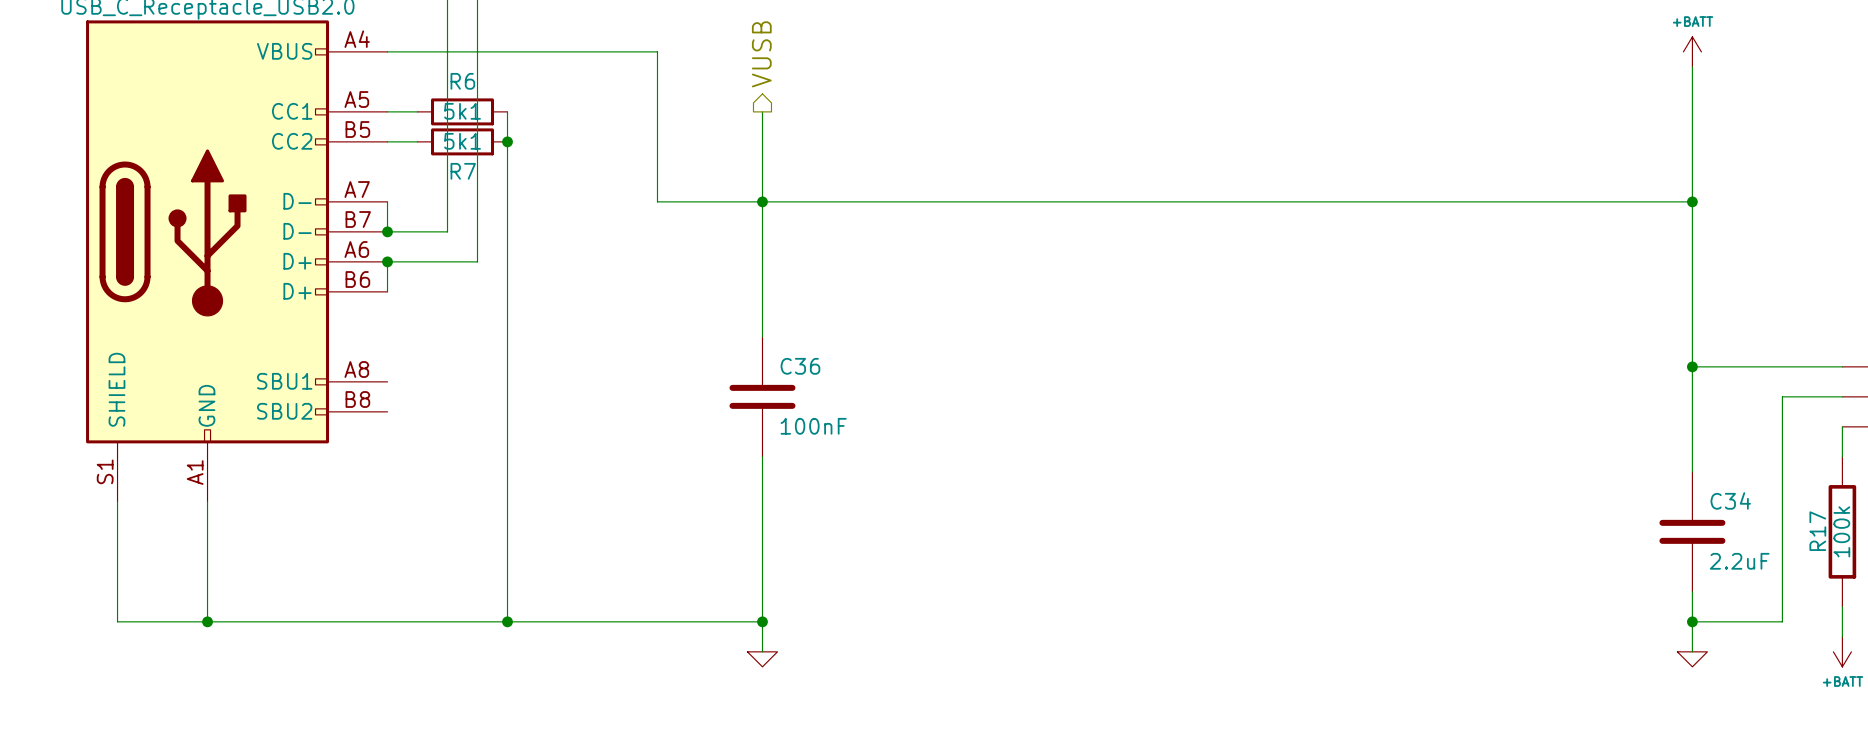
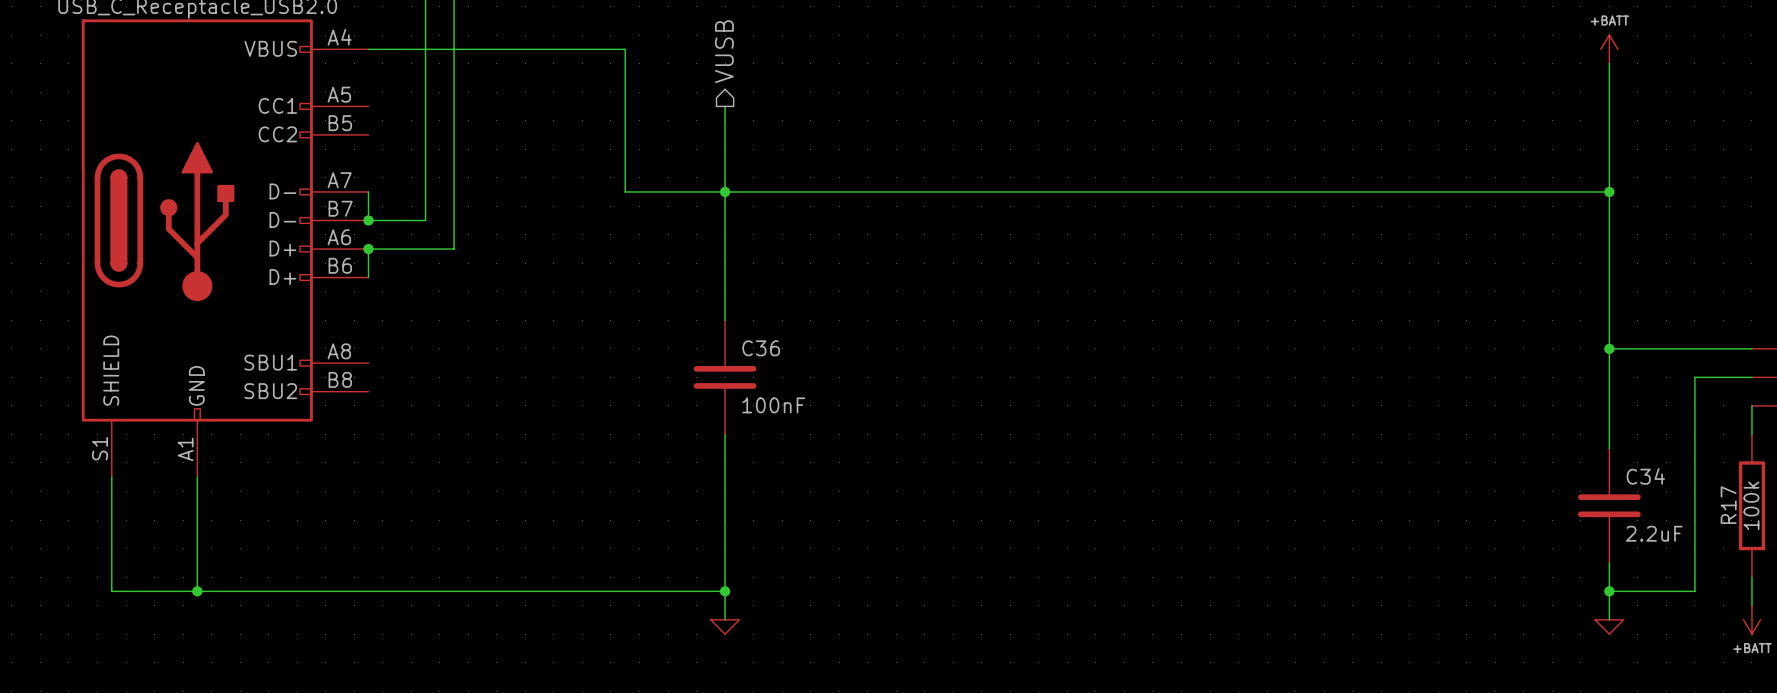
wire: (387, 111) (417, 111) -> none
R6: 5k1 (462, 111) -> none
wire: (507, 111) (507, 621) -> none
wire: (387, 141) (417, 141) -> none
R7: 5k1 (462, 141) -> none
junction: (507, 141) -> none
junction: (507, 621) -> none

